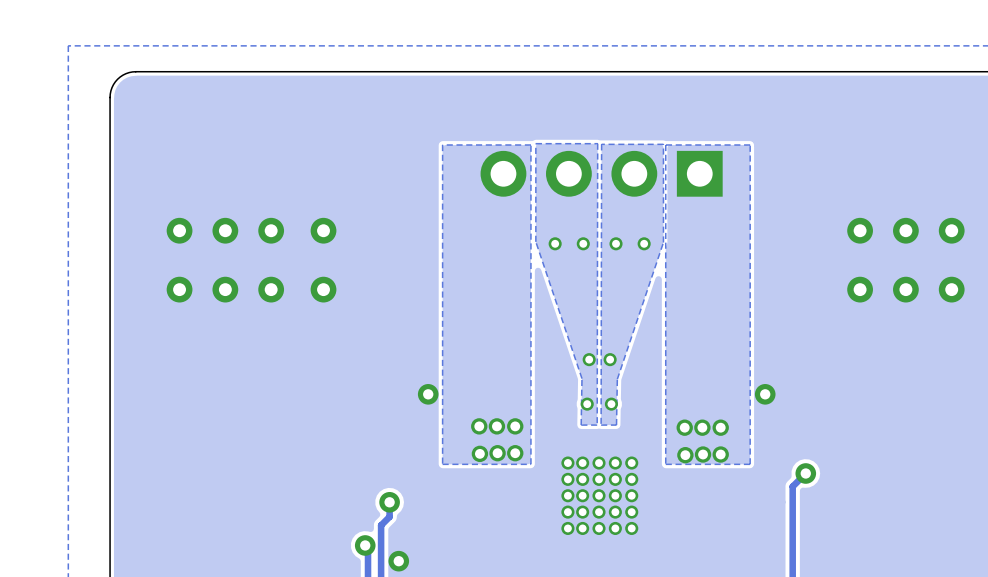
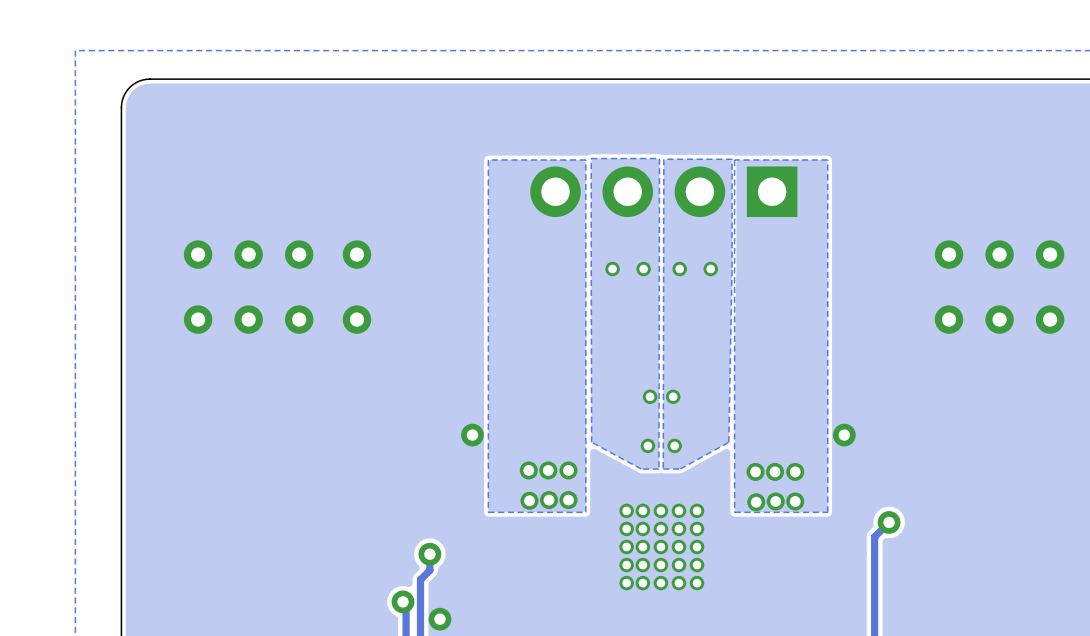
zone outline: (535, 241) (581, 378) (581, 425) -> (591, 266) (591, 442) (641, 469)
zone outline: (663, 242) (617, 379) (616, 425) -> (732, 267) (728, 442) (680, 469)

